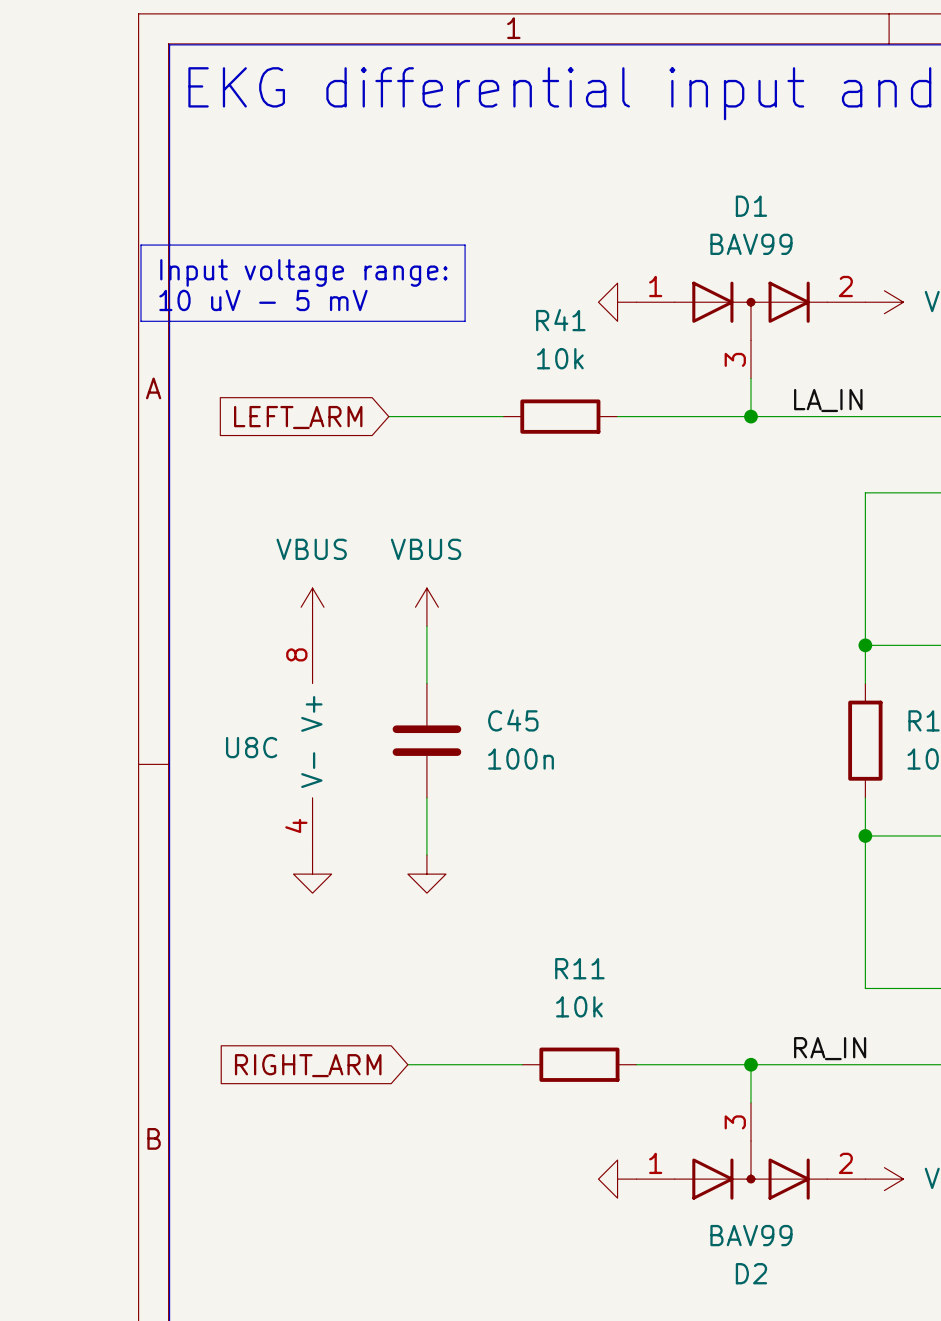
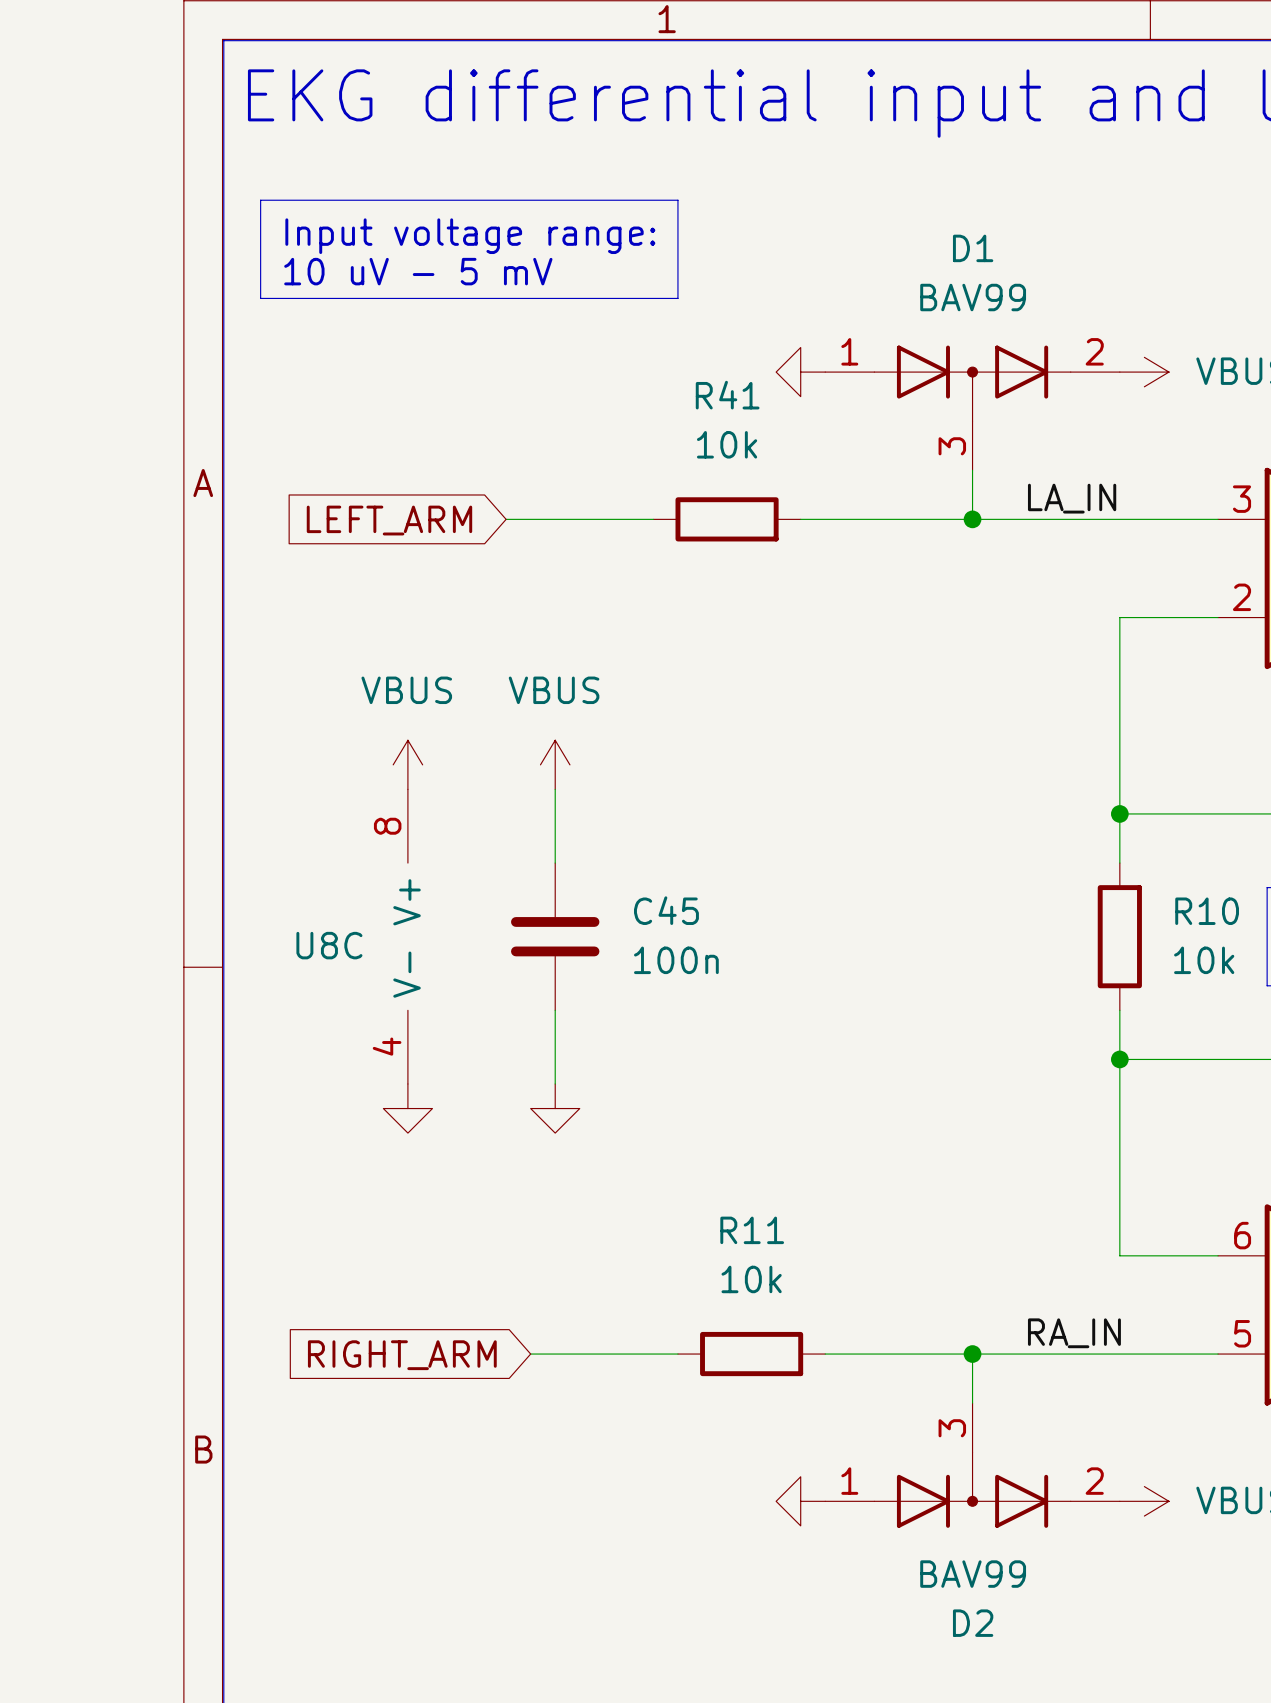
line: (198, 245) (141, 245) (141, 321) (465, 321) (465, 245) -> (260, 298) (260, 200) (677, 200) (677, 298) (604, 298)
text position: Input voltage range: (303, 272) -> Input voltage range: (470, 236)
text position: 10 uV - 5 mV (263, 300) -> 10 uV - 5 mV (418, 271)

